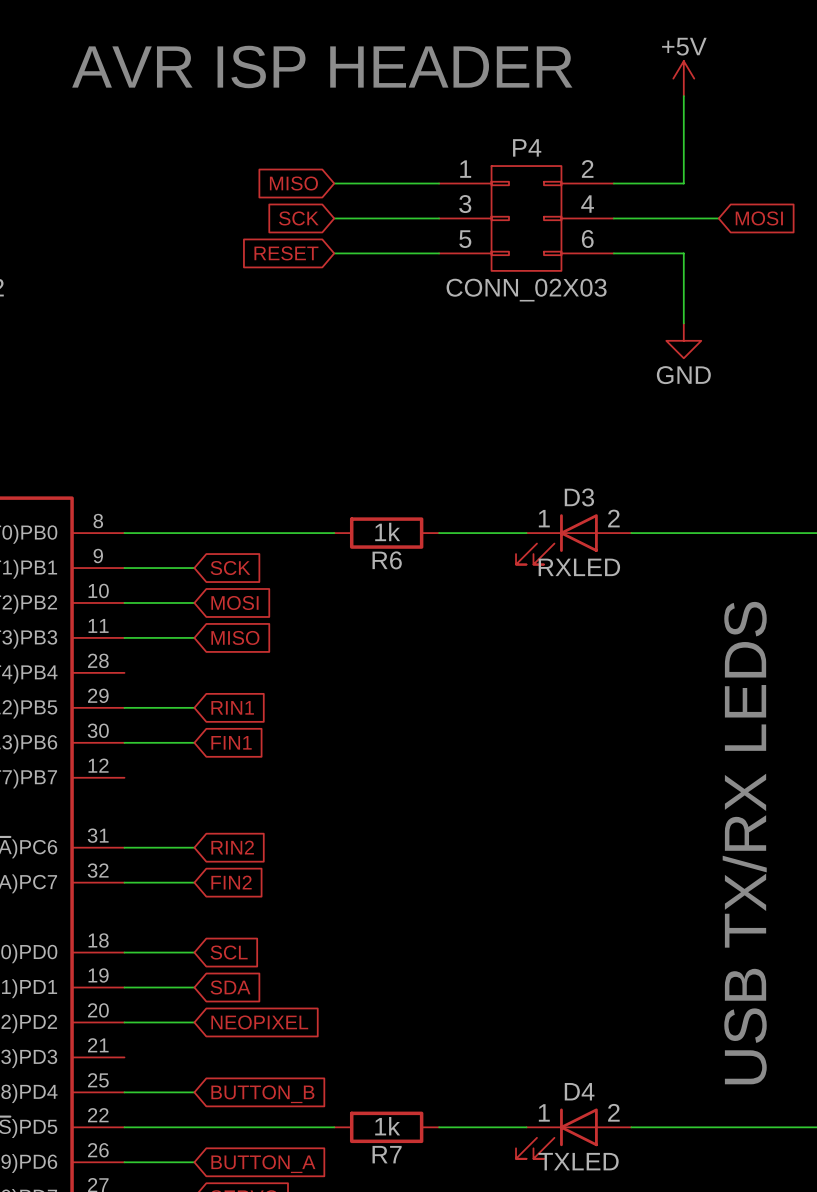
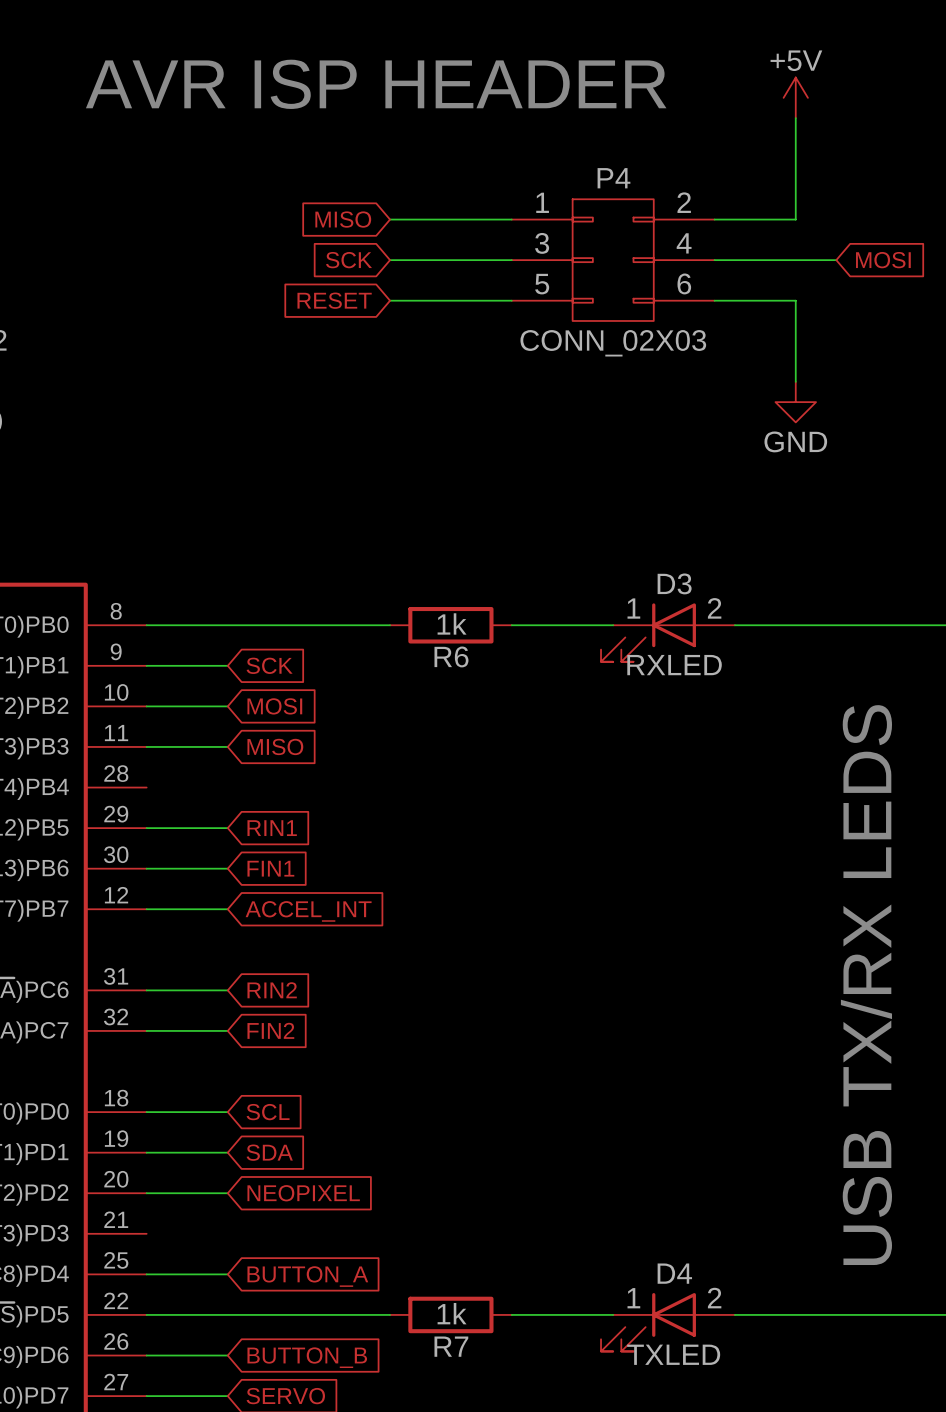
wire: none -> (146, 909) (227, 909)
global label: none -> ACCEL_INT (308, 911)
global label: BUTTON_B (262, 1094) -> BUTTON_A (307, 1276)
global label: BUTTON_A (263, 1164) -> BUTTON_B (307, 1357)

